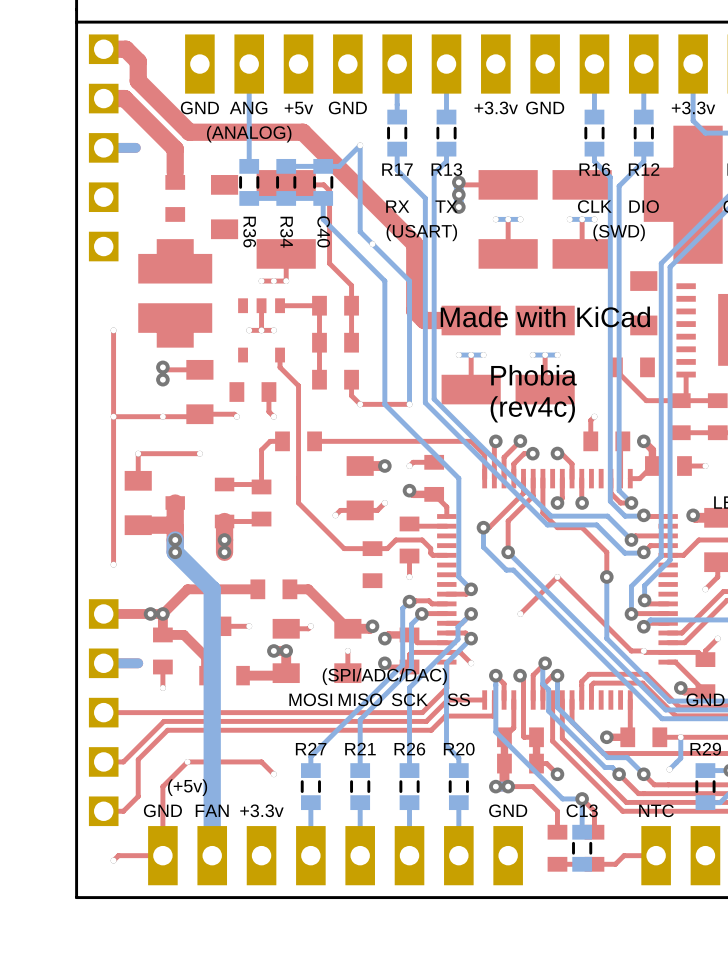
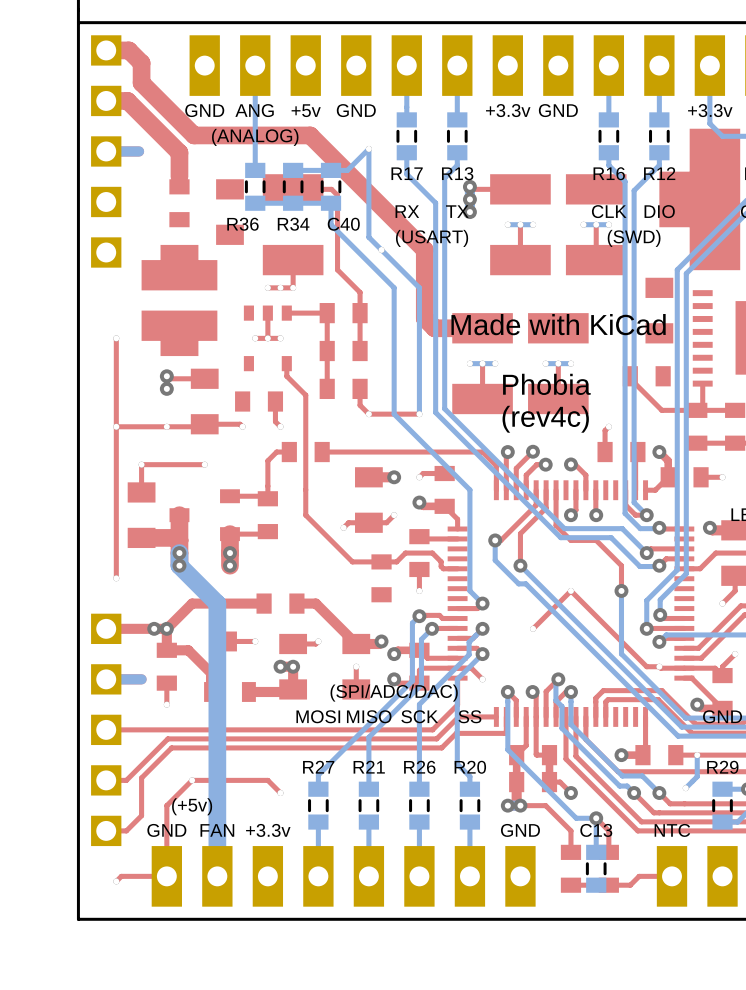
C40 name rotation: 0° (323, 231) -> 90° counterclockwise (343, 224)
R36 name rotation: 0° (249, 232) -> 90° counterclockwise (242, 224)
R34 name rotation: 0° (286, 232) -> 90° counterclockwise (293, 224)

